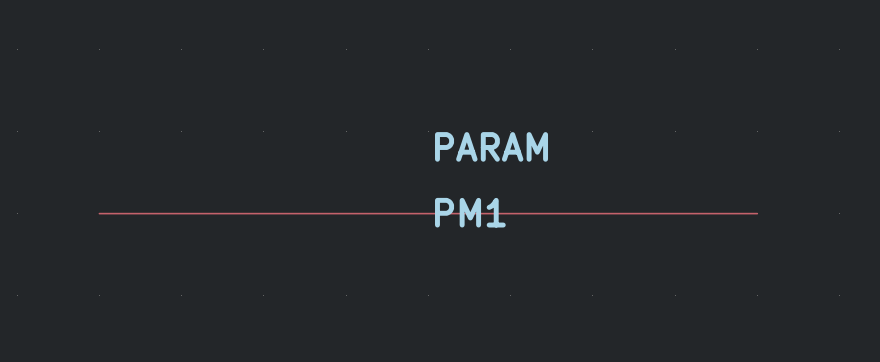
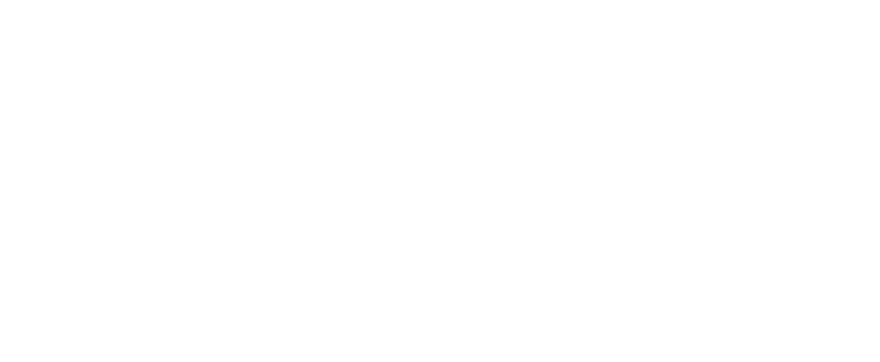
PM1: PARAM (428, 213) -> none

